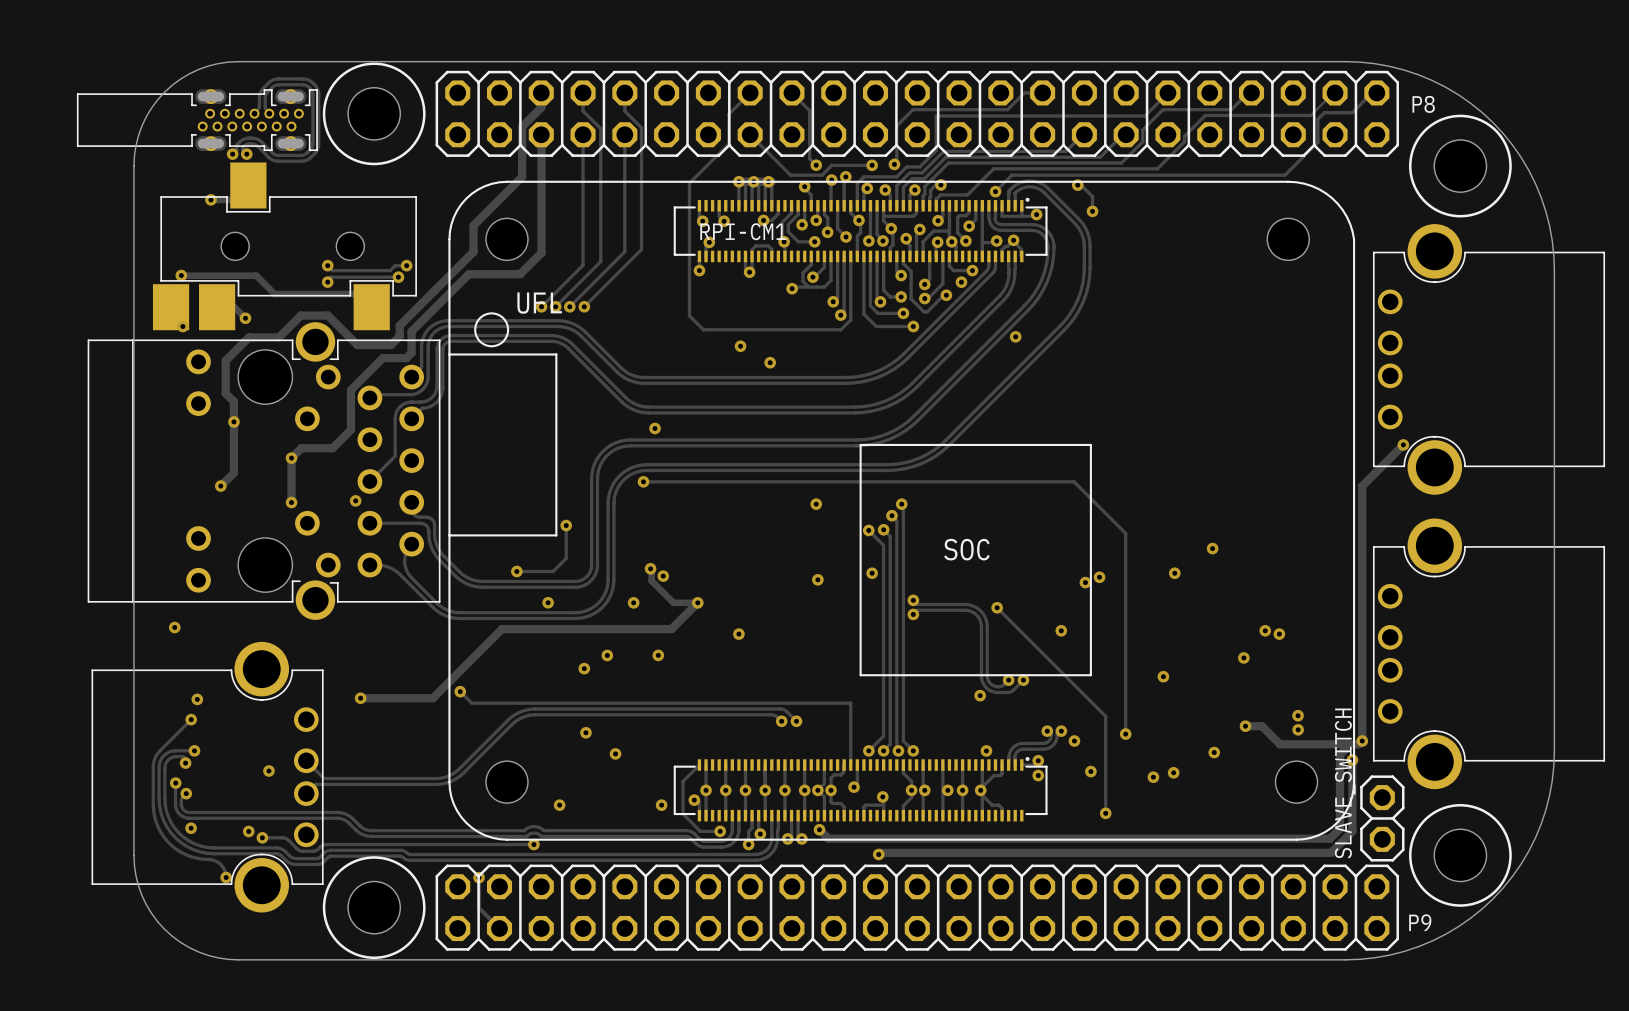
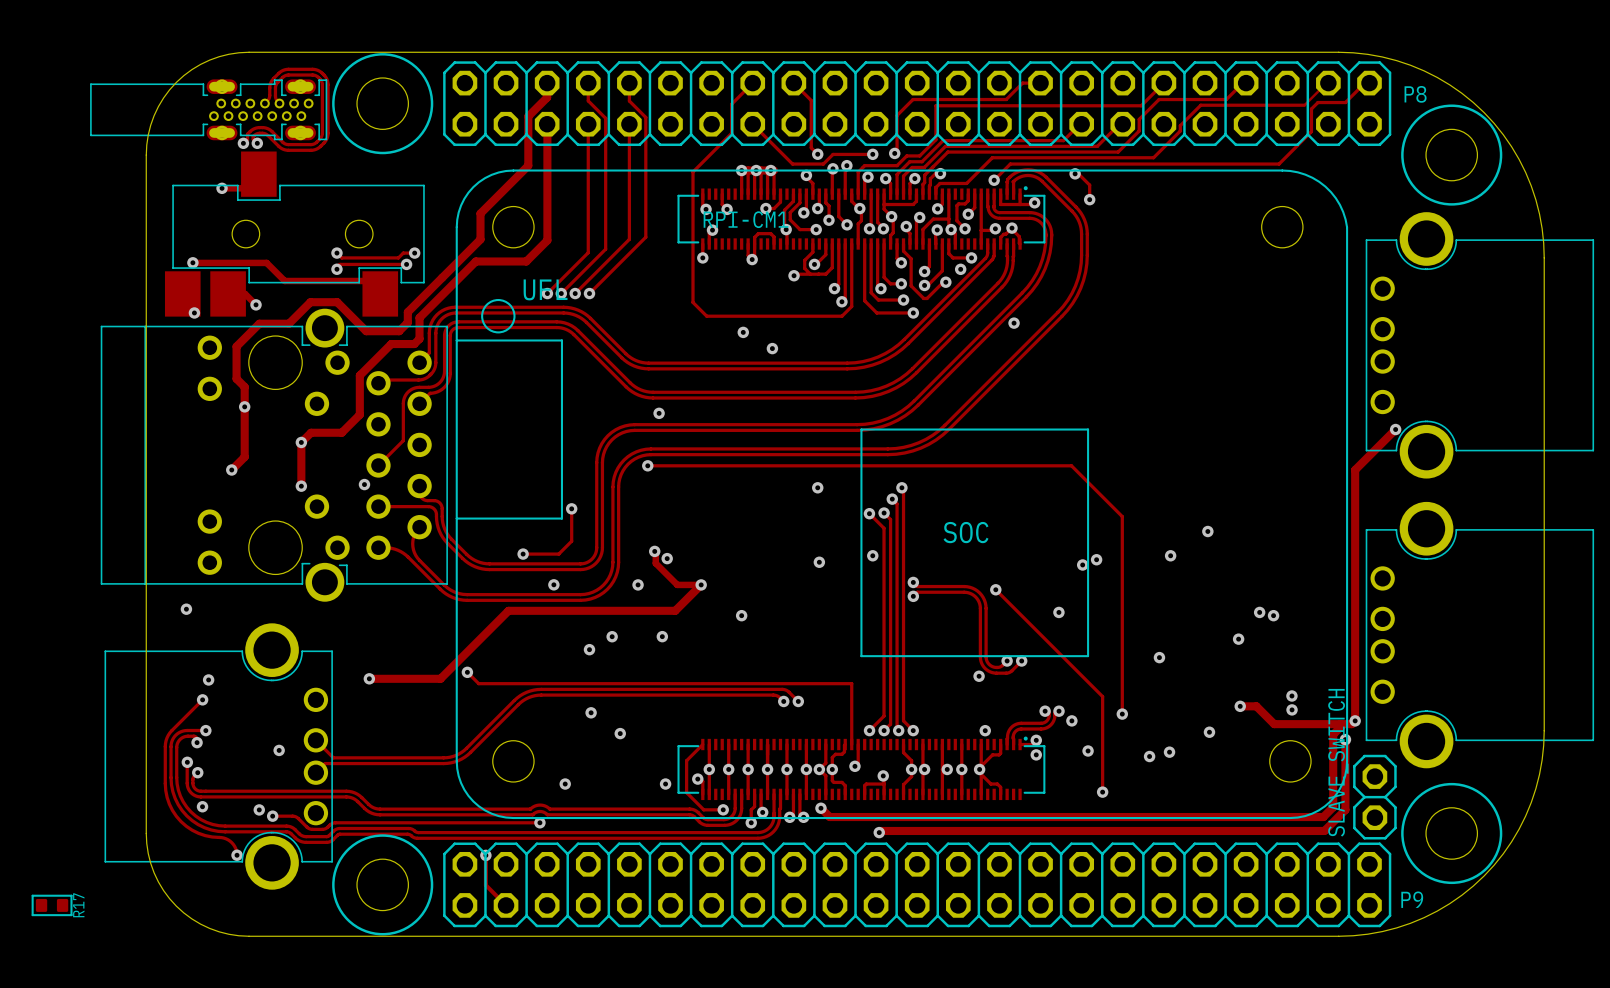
R17: none -> (52, 905)

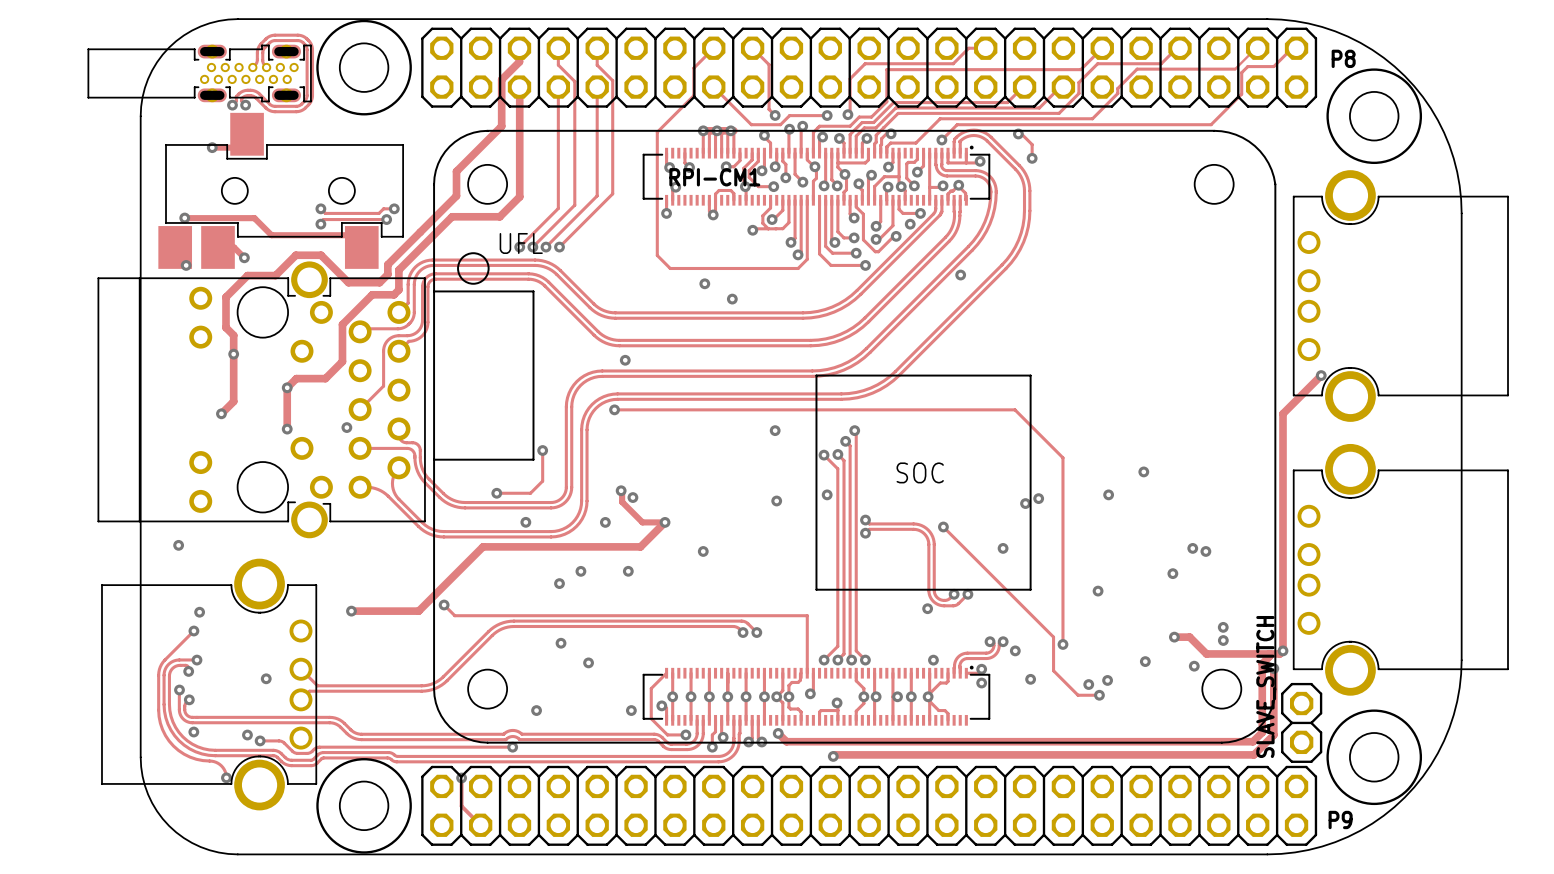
track: (1102, 696) (1102, 792) -> (1044, 627) (1053, 637) (1053, 670) (1078, 695) (1099, 695)
via: none -> (1194, 666)
via position: (1102, 792) -> (1099, 695)
R17: (52, 905) -> none

